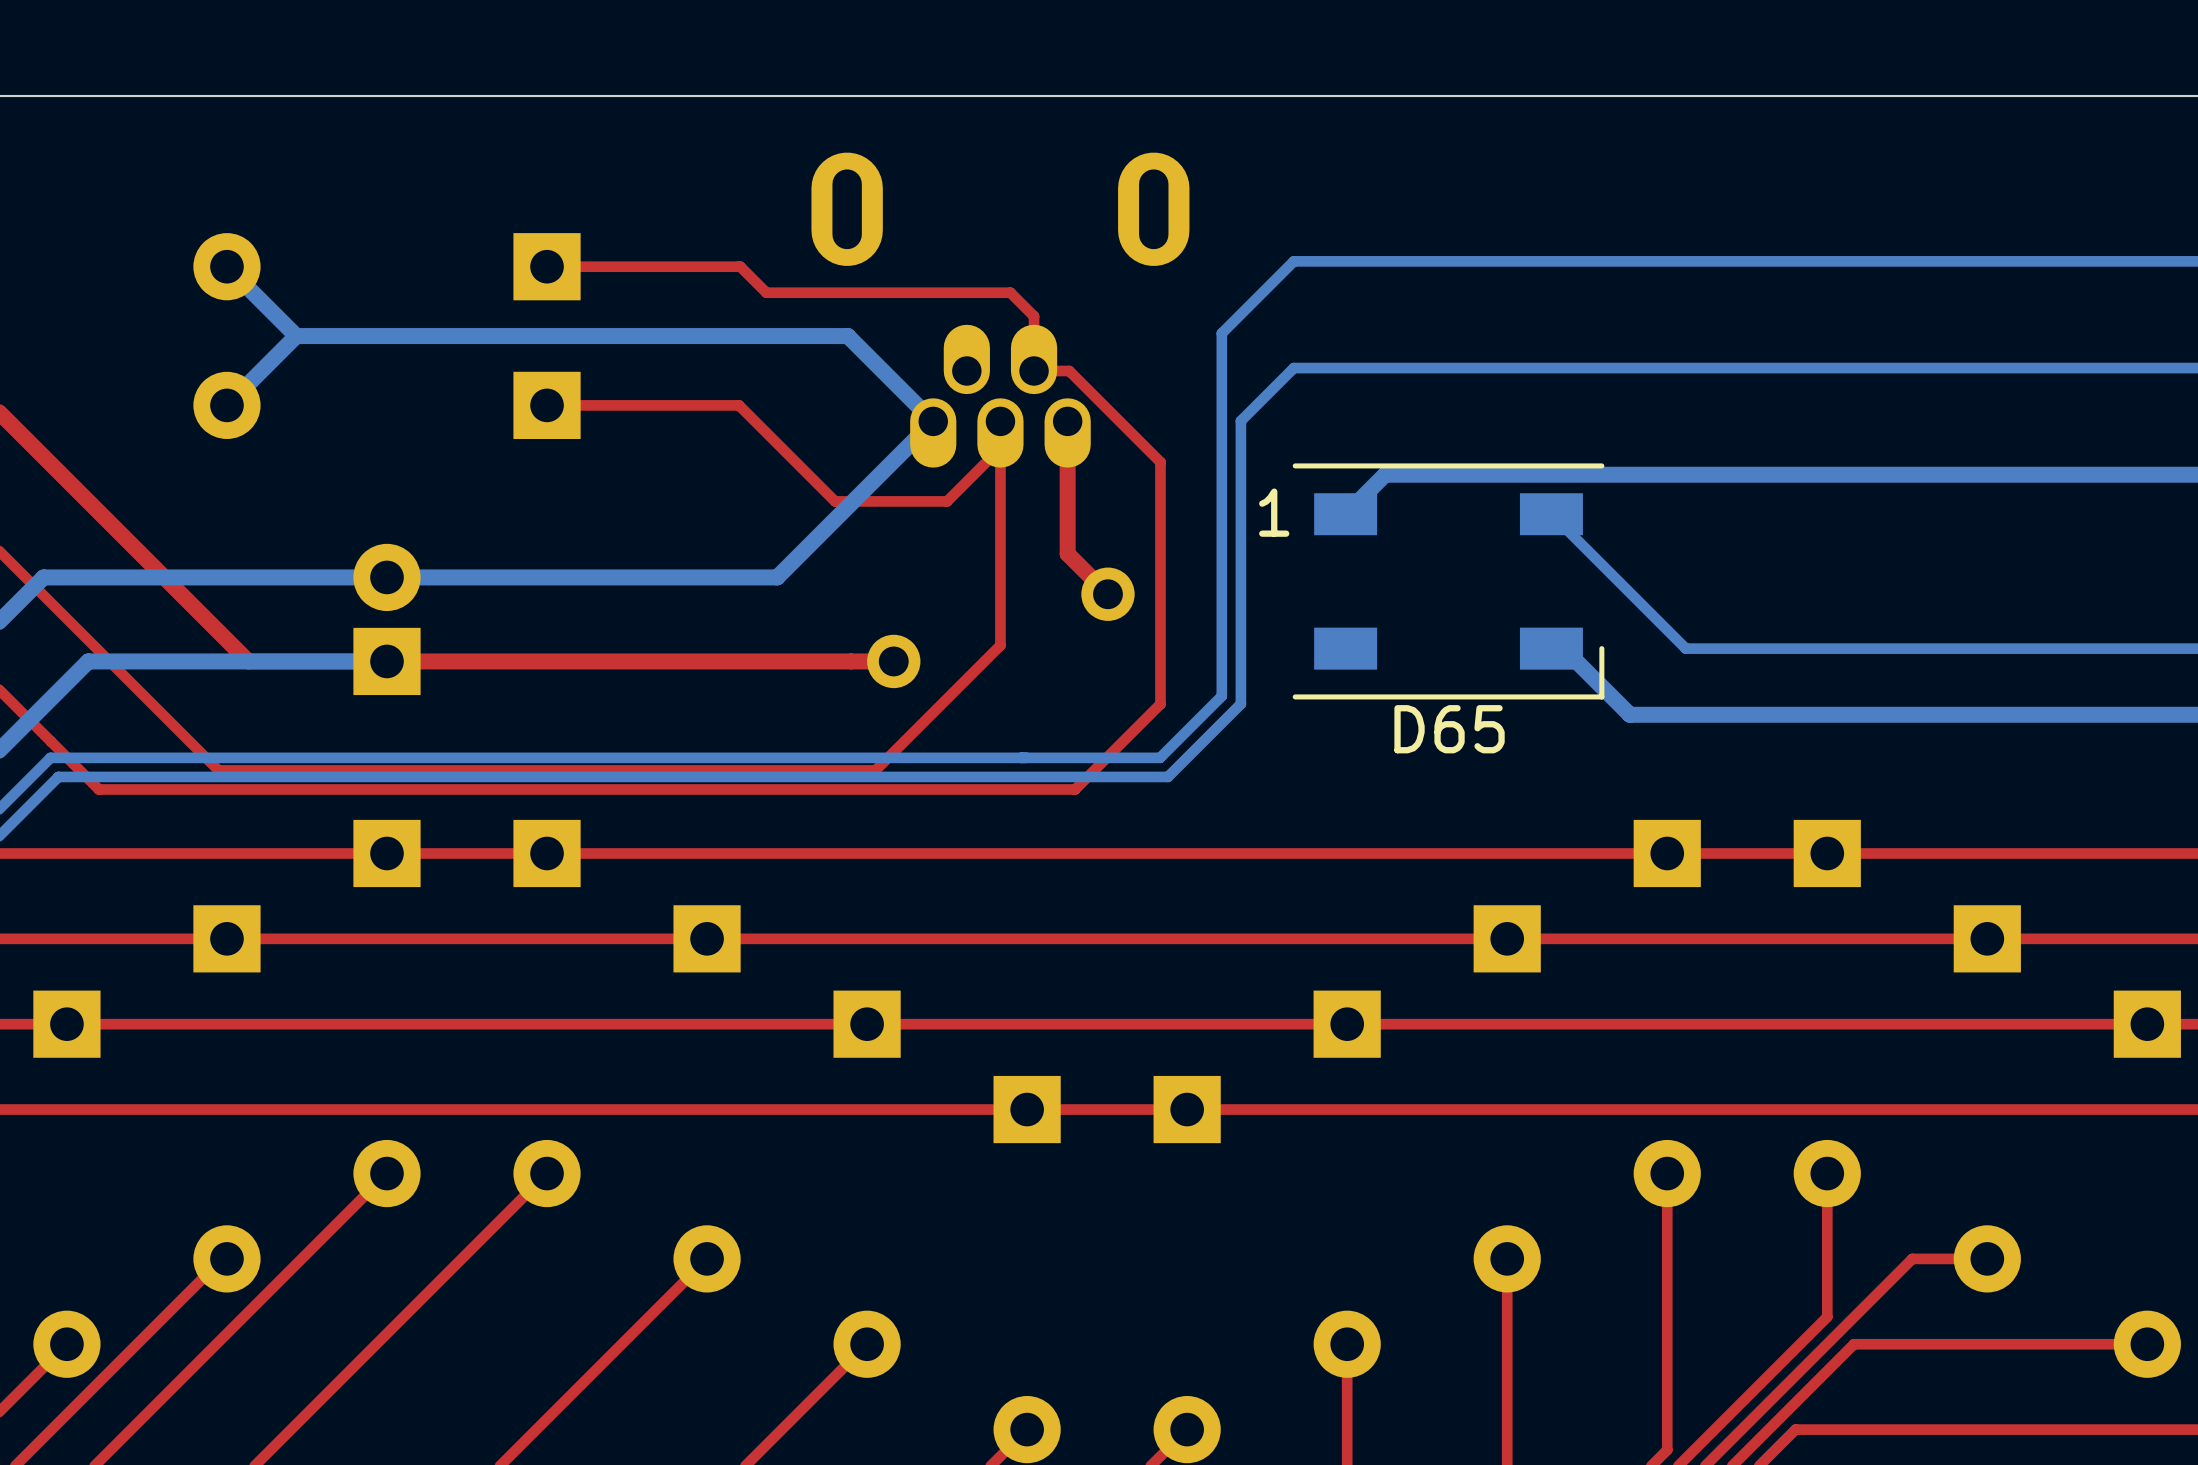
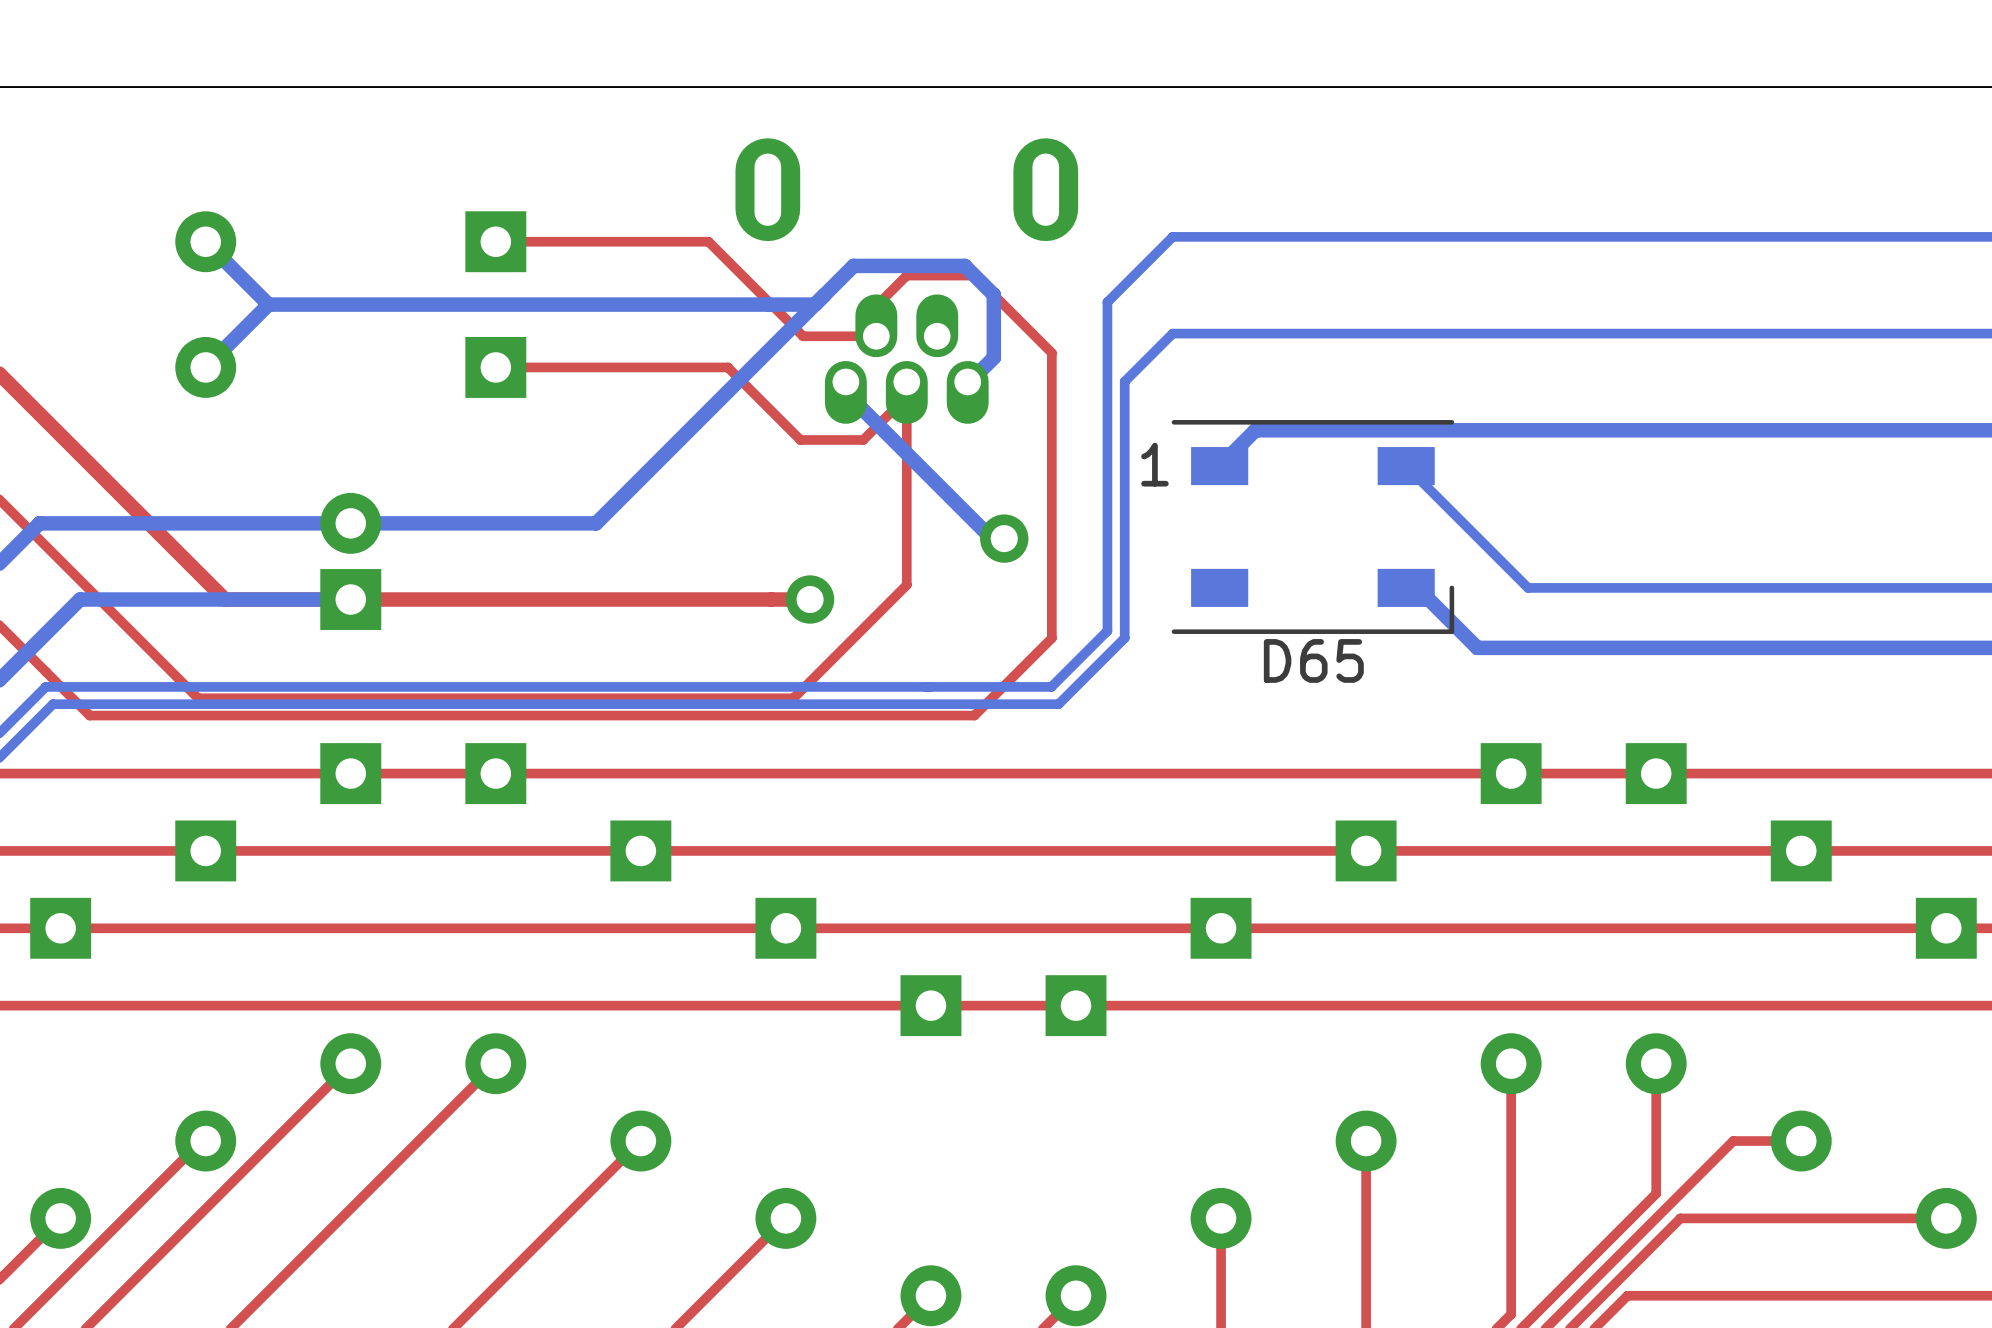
top track: (740, 266) (766, 292) (1010, 292) (1034, 316) (1034, 363) -> (671, 241) (708, 241) (803, 336) (876, 336) (876, 306) (906, 275) (974, 275) (1051, 352) (1051, 418)
bottom track: (847, 336) (933, 421) (777, 577) (657, 577) -> (973, 376) (967, 381) (993, 357) (993, 294) (964, 265) (853, 265) (596, 523)
bottom track: none -> (814, 304) (768, 304)
top track: (1034, 370) (1069, 370) (1160, 462) -> none
top track: (739, 405) (835, 501) (947, 501) (1000, 448) -> (669, 367) (727, 367) (800, 439) (863, 439) (906, 396)
bottom track: none -> (845, 381) (845, 392) (991, 538) (1004, 538)
top track: (1067, 421) (1067, 553) (1107, 594) -> none

